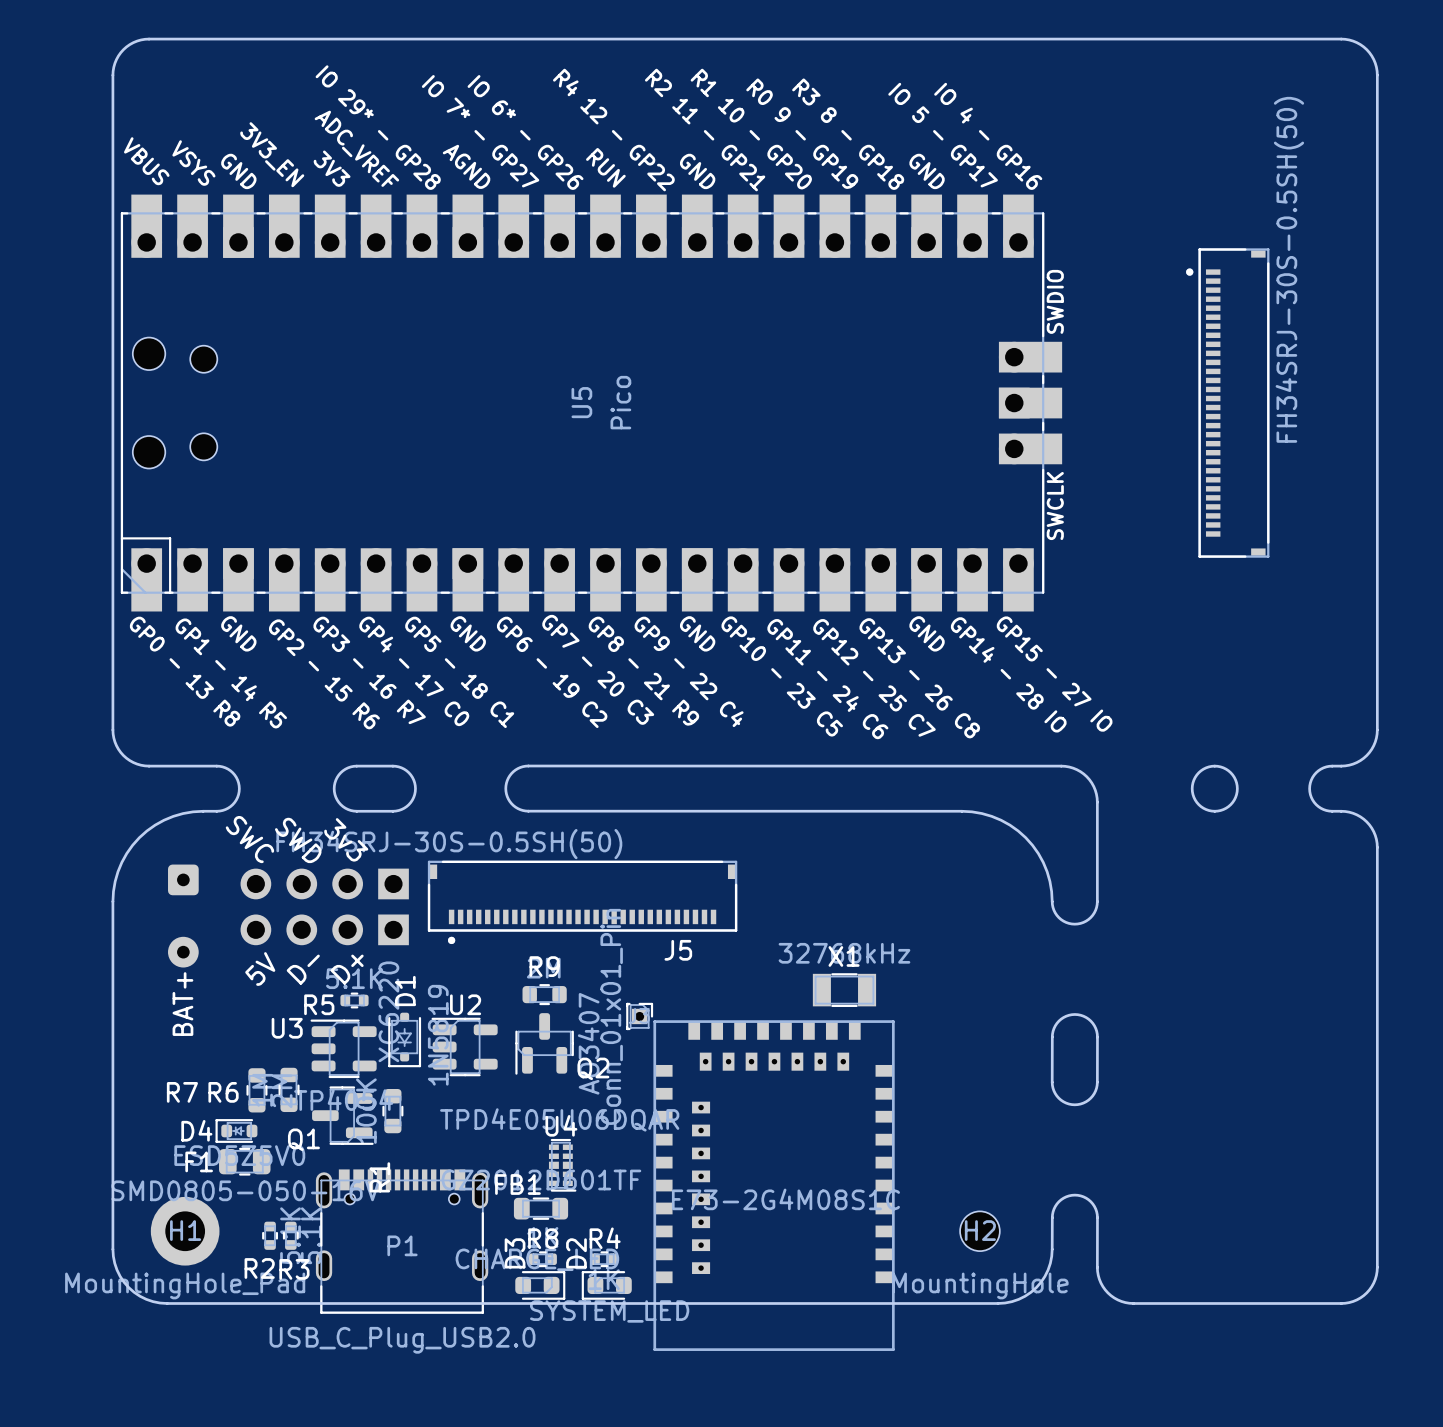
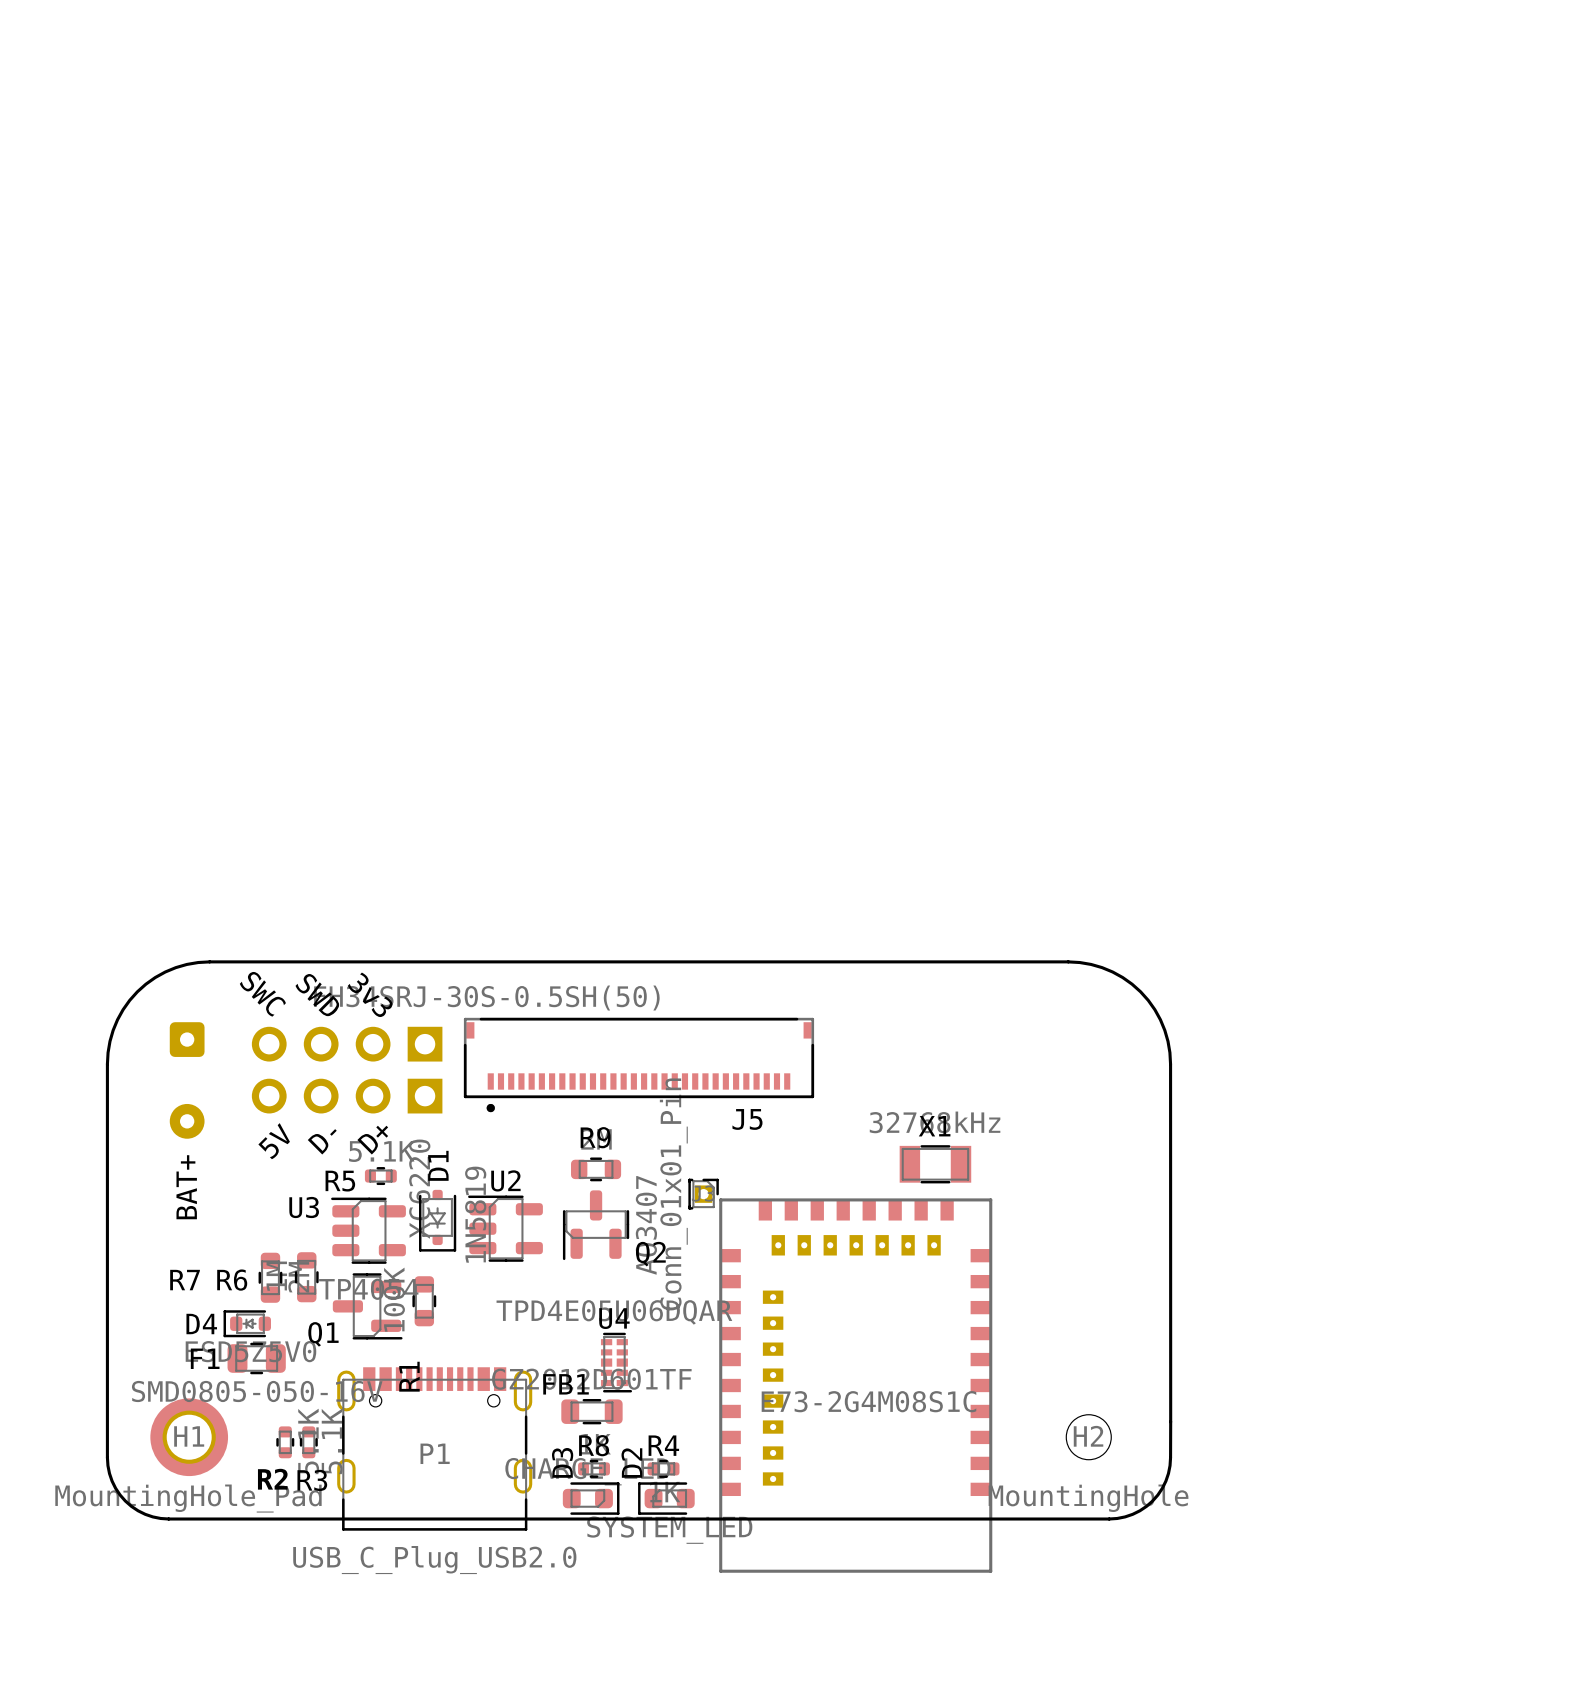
text: IO 29* - (352, 102) -> none
text: R4 12 - (587, 104) -> none
text: R2 11 - (679, 104) -> none
text: R1 10 - (725, 104) -> none
text: IO 7* - (453, 107) -> none
text: IO 6* - (499, 107) -> none
text: R0 9 - (776, 109) -> none
text: R3 8 - (821, 109) -> none
text: IO 5 - (915, 111) -> none
text: IO 4 - (961, 111) -> none
U5: Pico (591, 403) -> none
part: FH34SRJ-30S-0.5SH(50) (1227, 403) -> none
text: - 20 C3 (618, 690) -> none
text: - 16 R7 (389, 691) -> none
text: - 21 R9 (663, 691) -> none
text: - 13 R8 (204, 692) -> none
text: - 17 C0 (434, 692) -> none
text: - 22 C4 (708, 692) -> none
text: - 18 C1 (479, 693) -> none
text: - 19 C2 (571, 693) -> none
text: - 14 R5 (251, 694) -> none
text: - 15 R6 (344, 695) -> none
text: - 27 IO (1079, 699) -> none
text: - 28 IO (1033, 700) -> none
text: - 23 C5 (807, 702) -> none
text: - 25 C7 (899, 703) -> none
text: - 24 C6 (852, 704) -> none
text: - 26 C8 (944, 704) -> none
board edge: (1214, 766) (1206, 767) (1198, 772) (1193, 780) (1192, 788) (1193, 797) (1198, 804) (1206, 809) (1214, 811) (1223, 809) (1230, 804) (1235, 797) (1237, 788) (1235, 780) (1230, 772) (1223, 767) (1214, 766) -> none
board edge: (216, 811) (230, 806) (237, 797) (238, 782) (230, 770) (219, 766) (149, 766) (137, 764) (120, 752) (113, 734) (112, 75) (116, 59) (129, 44) (149, 39) (1341, 39) (1356, 42) (1371, 55) (1377, 75) (1377, 734) (1373, 745) (1363, 758) (1349, 765) (1329, 766) (1320, 769) (1312, 777) (1309, 788) (1312, 799) (1320, 808) (1329, 811) (1349, 812) (1363, 819) (1371, 828) (1377, 843) (1376, 1275) (1366, 1292) (1356, 1299) (1345, 1303) (1125, 1302) (1110, 1295) (1099, 1279) (1097, 1267) (1097, 1214) (1092, 1203) (1080, 1195) (1069, 1195) (1056, 1203) (1052, 1217) -> none
board edge: (356, 811) (348, 809) (340, 804) (335, 797) (334, 788) (335, 780) (340, 772) (348, 767) (356, 766) (395, 766) (404, 769) (410, 774) (415, 785) (412, 799) (404, 808) (392, 811) -> (383, 961) (224, 961)
board edge: none -> (424, 961) (1068, 961)
board edge: (961, 811) (528, 811) (517, 808) (511, 803) (505, 788) (507, 780) (513, 771) (528, 766) (1069, 767) (1086, 776) (1096, 794) (1097, 904) (1090, 917) (1083, 922) (1074, 924) (1066, 922) (1058, 917) (1053, 910) (1052, 901) -> (1170, 1421) (1170, 1064)
board edge: (1052, 1037) (1052, 1082) (1055, 1093) (1061, 1100) (1068, 1104) (1077, 1104) (1086, 1101) (1094, 1093) (1097, 1085) (1097, 1037) (1094, 1025) (1083, 1016) (1069, 1015) (1056, 1023) (1052, 1037) -> none

